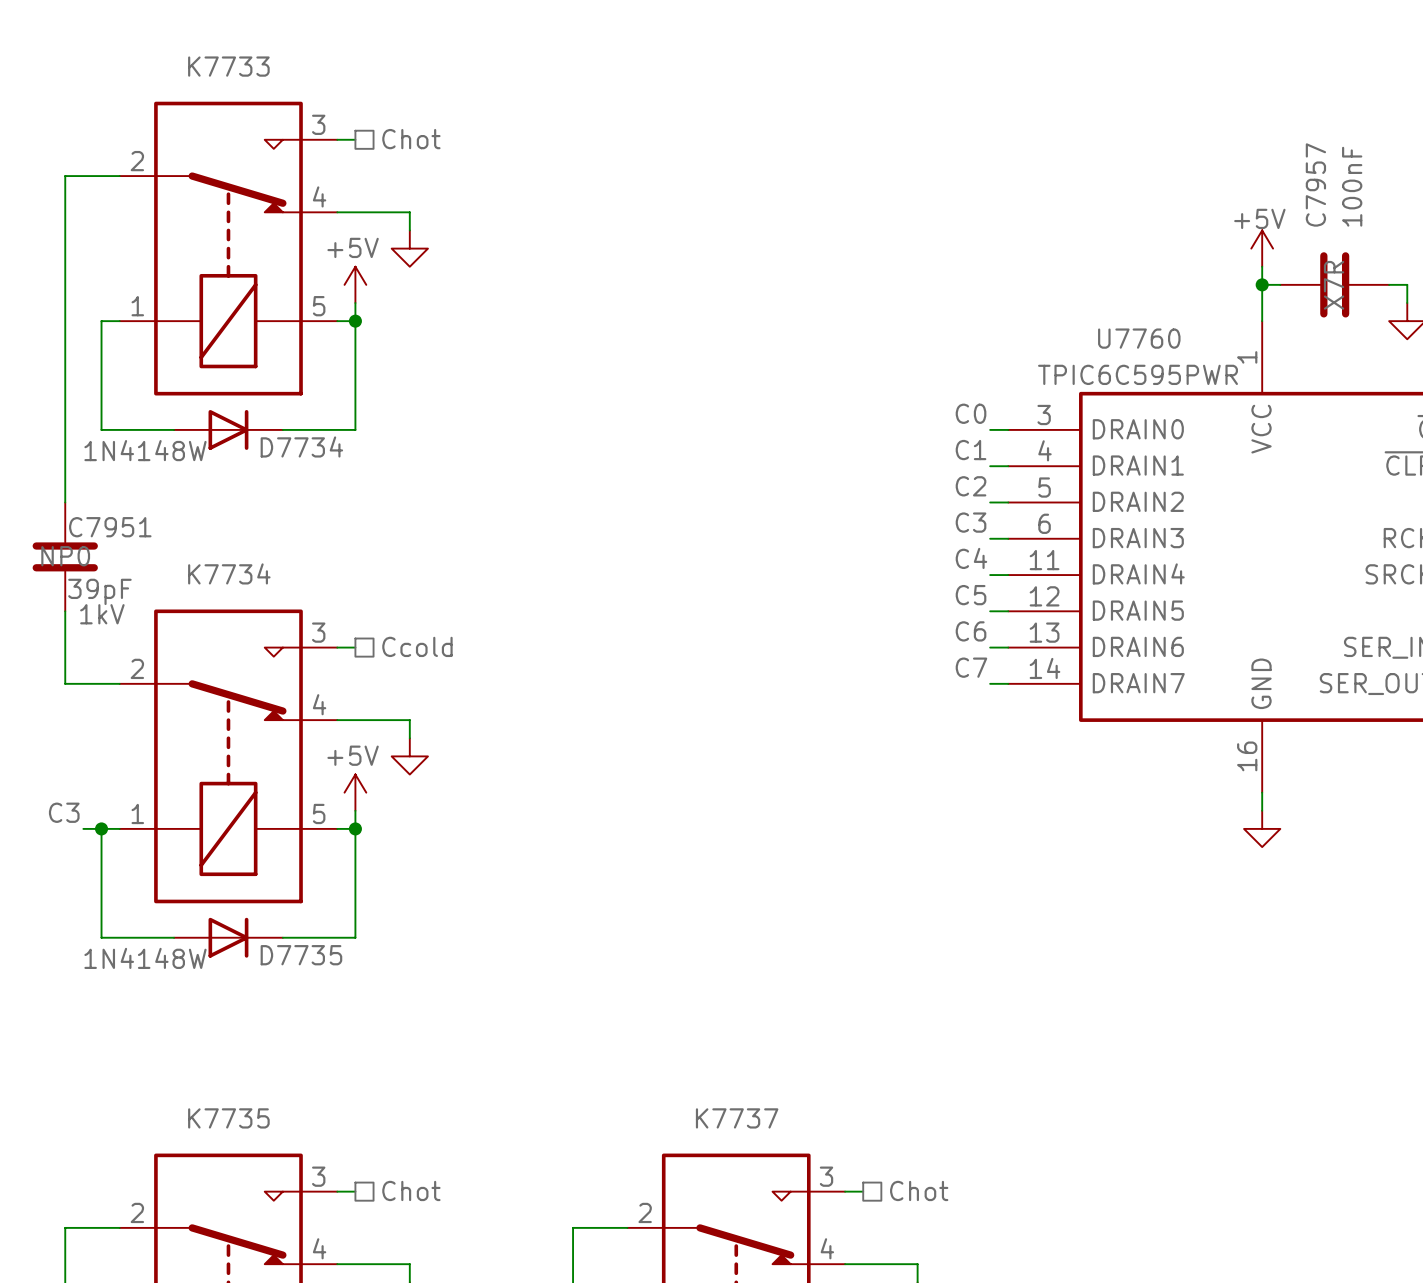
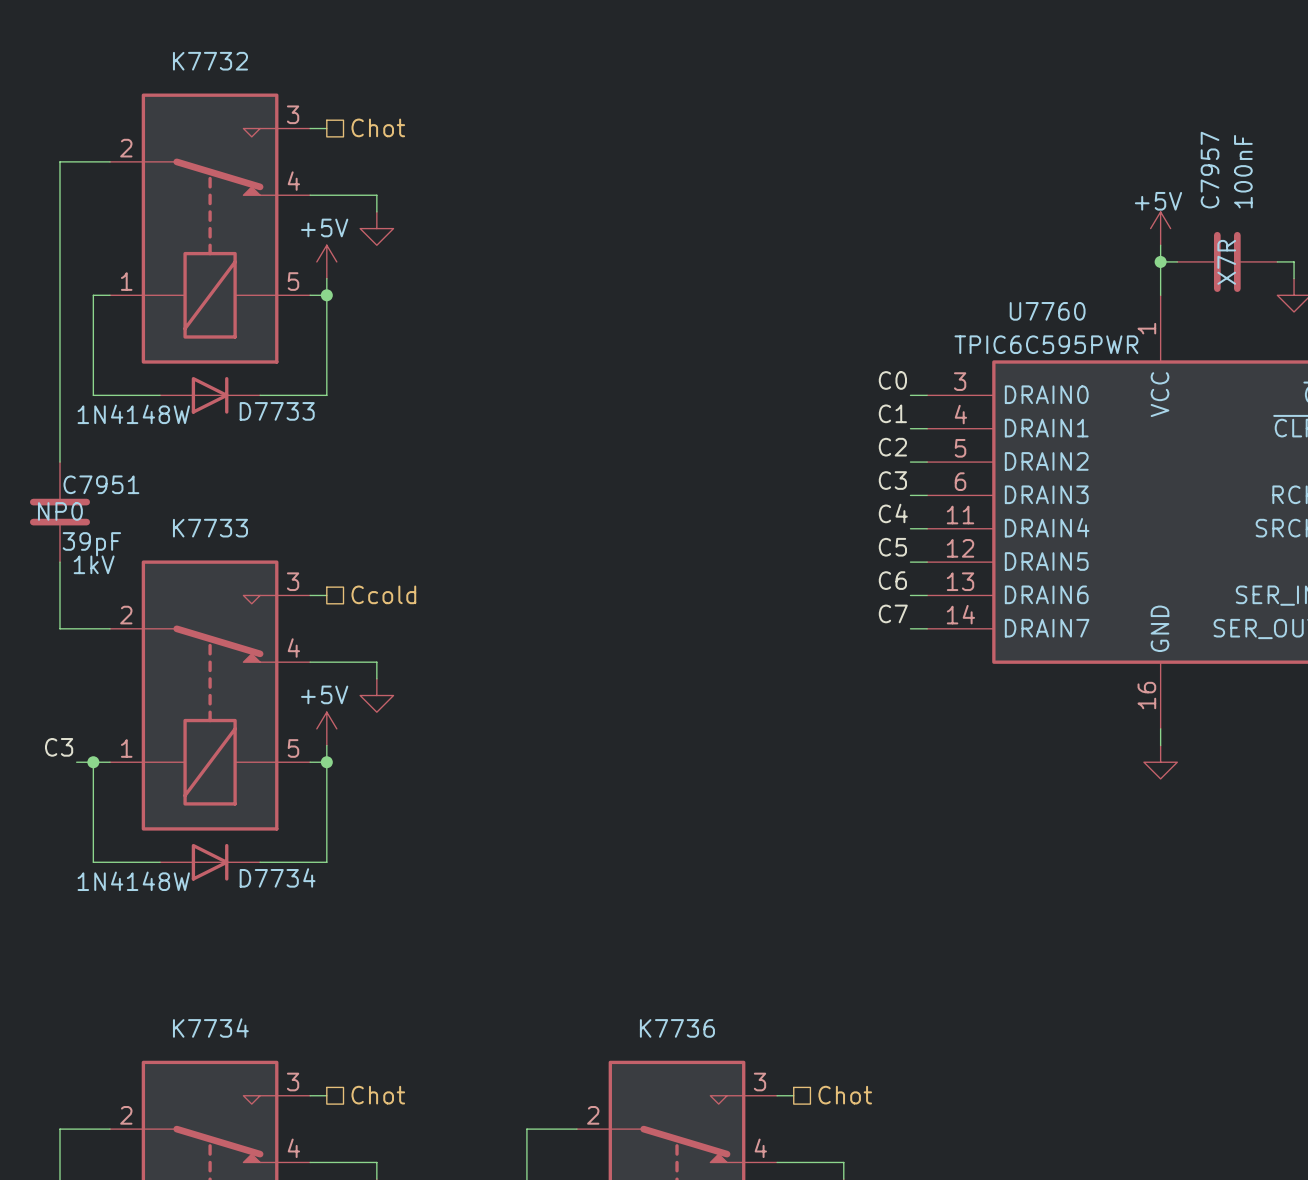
K7733 name: K7733 (228, 66) -> K7732 (210, 61)
D7734 name: D7734 (301, 446) -> D7733 (277, 411)
K7734 name: K7734 (229, 573) -> K7733 (210, 528)
D7735 name: D7735 (301, 955) -> D7734 (277, 877)
K7735 name: K7735 (228, 1118) -> K7734 (210, 1028)
K7737 name: K7737 (737, 1118) -> K7736 (677, 1028)

